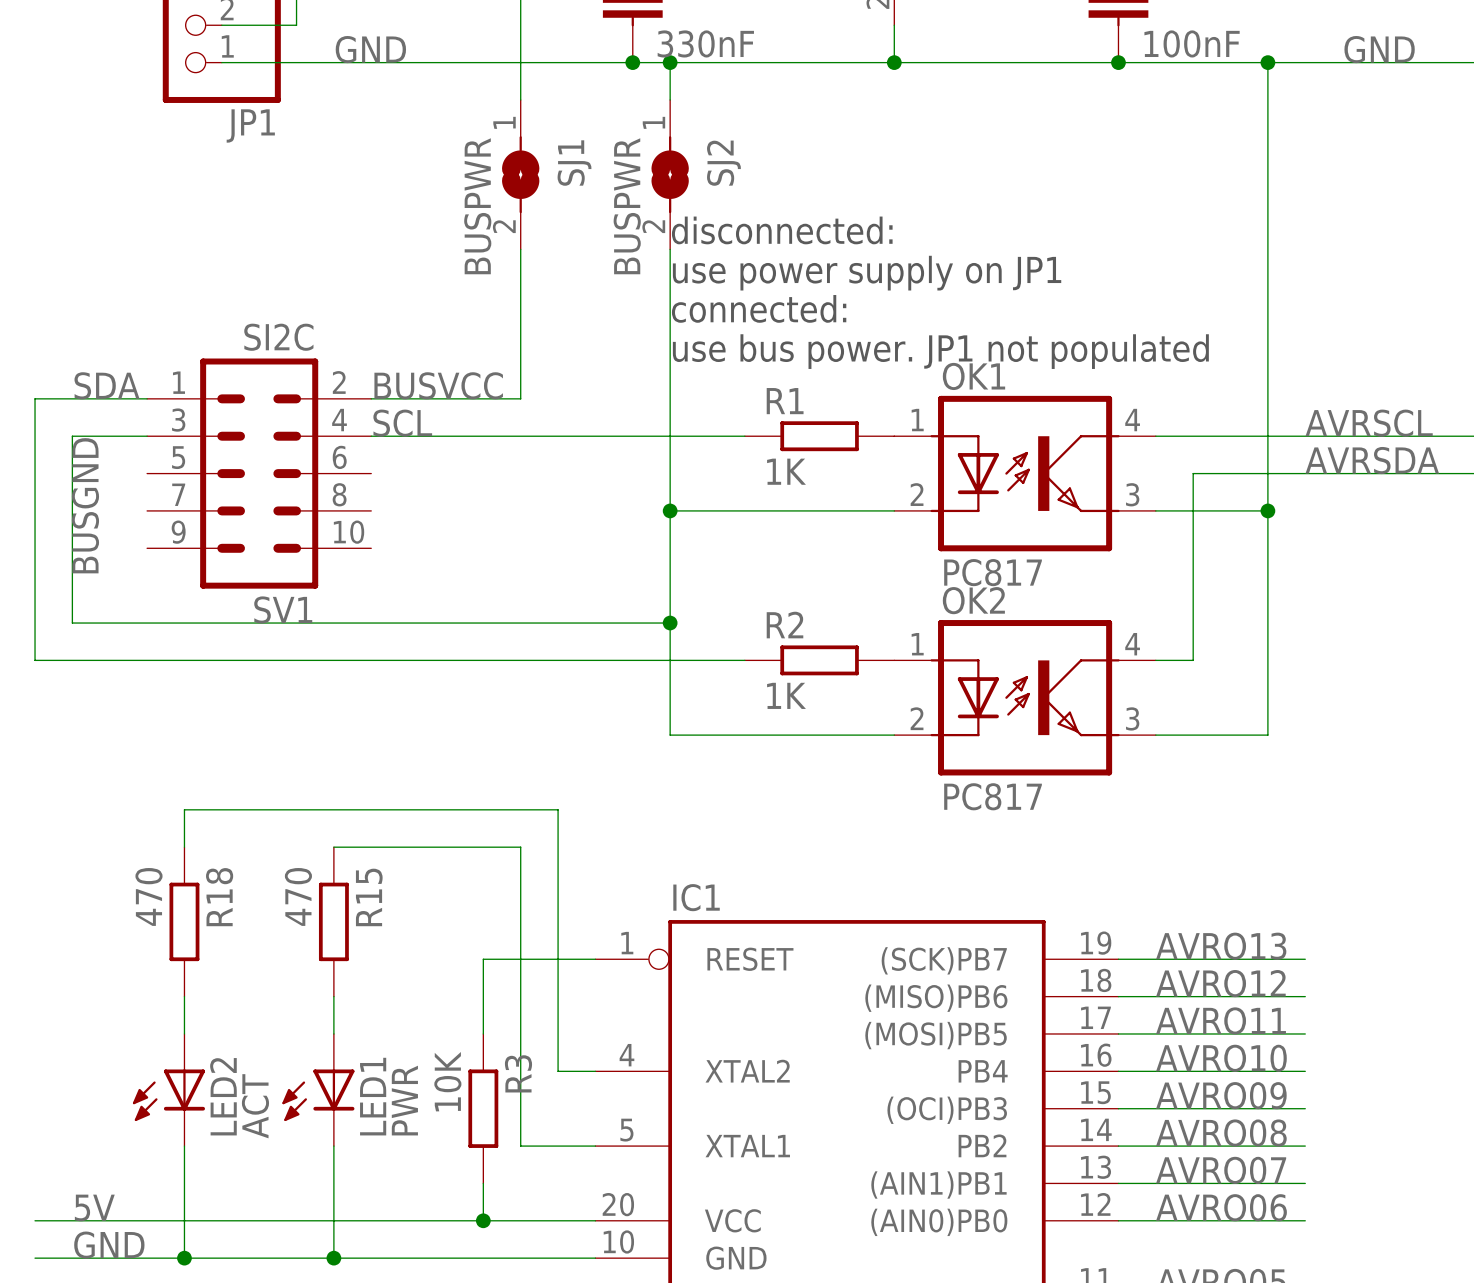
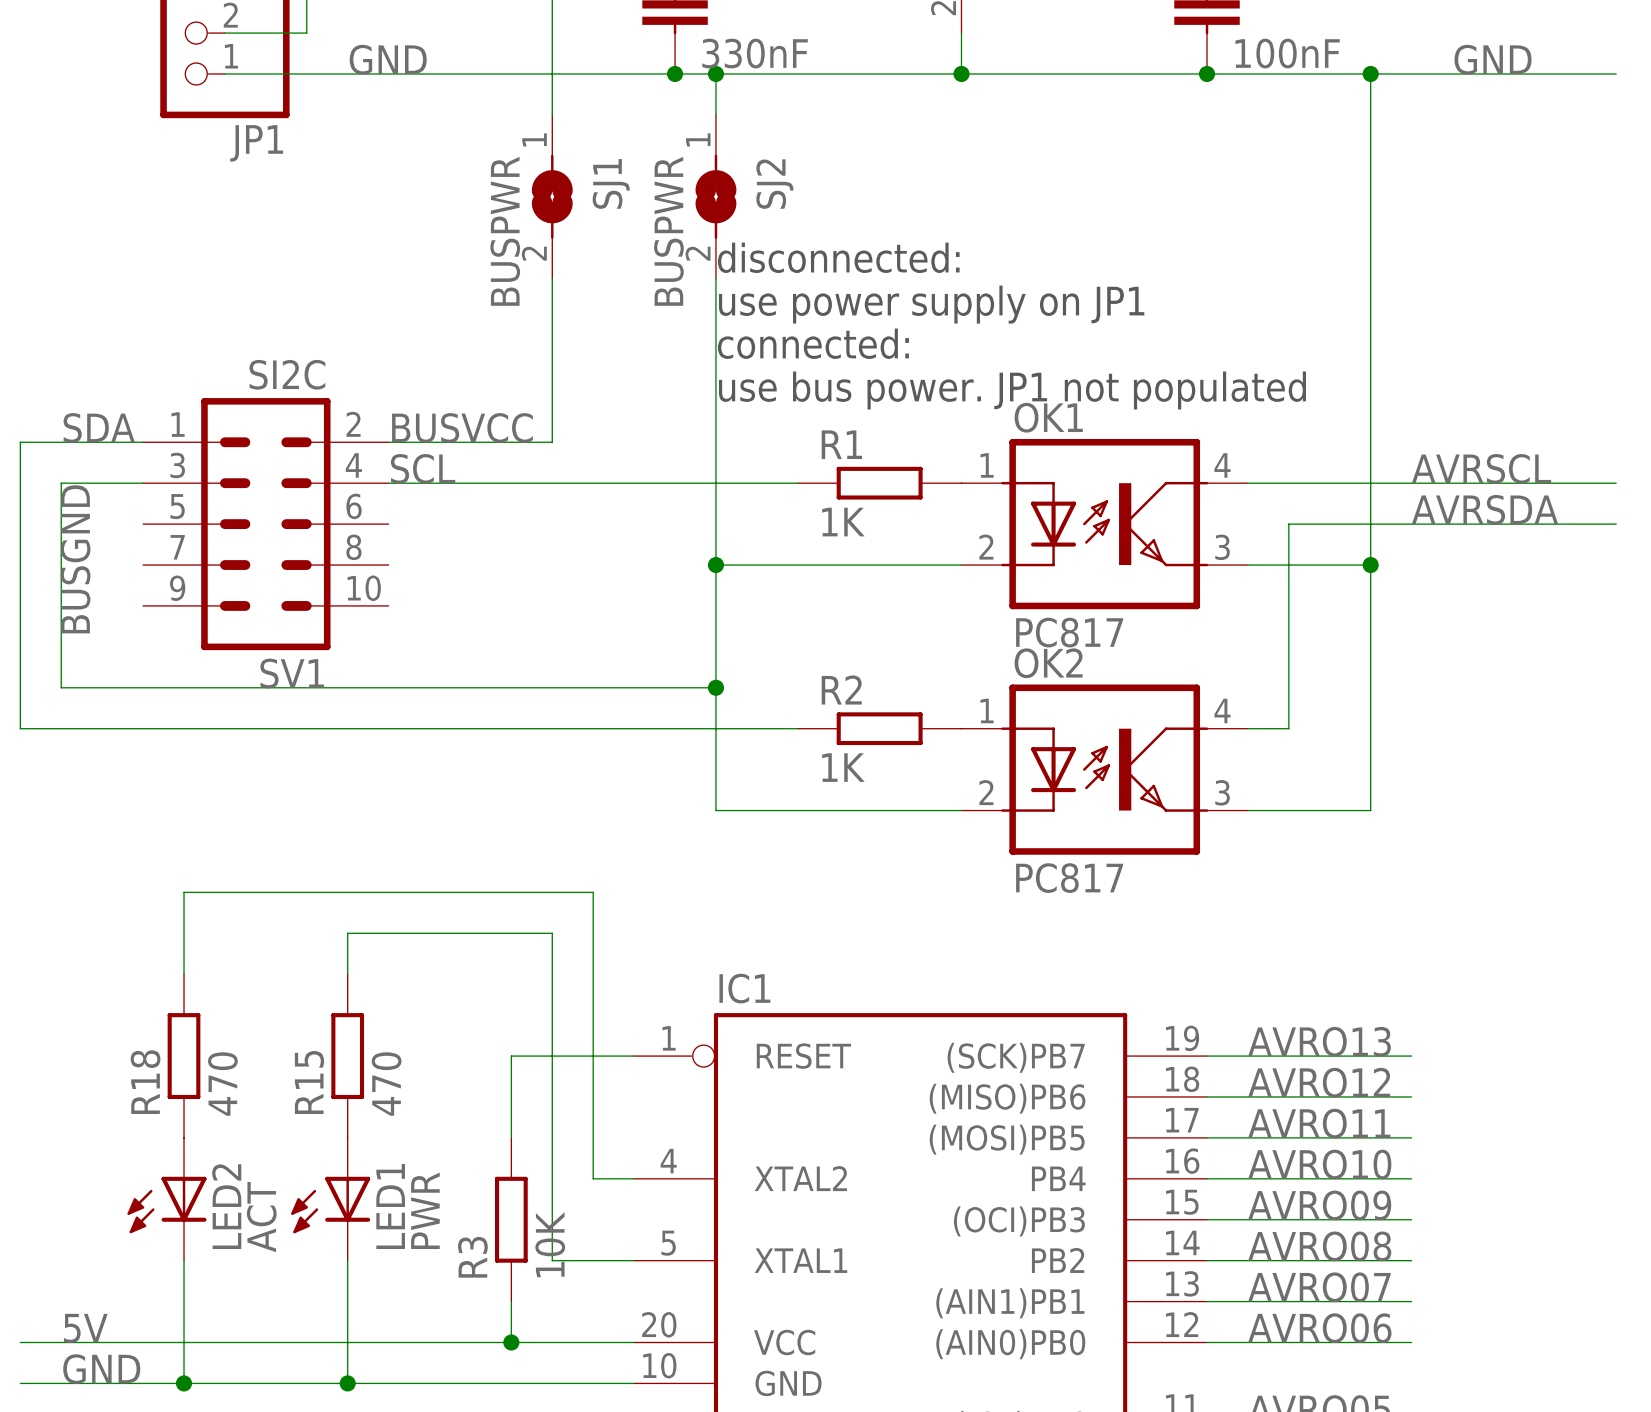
R18 value position: 470 (148, 896) -> 470 (222, 1084)
R15 value position: 470 (298, 896) -> 470 (386, 1084)
R18 name position: R18 (219, 897) -> R18 (145, 1082)
R15 name position: R15 (369, 897) -> R15 (309, 1082)
R18 position: (184, 921) -> (184, 1056)
R15 position: (333, 921) -> (347, 1056)
R3 name position: R3 (518, 1073) -> R3 (472, 1257)
R3 value position: 10K (447, 1081) -> 10K (550, 1244)

